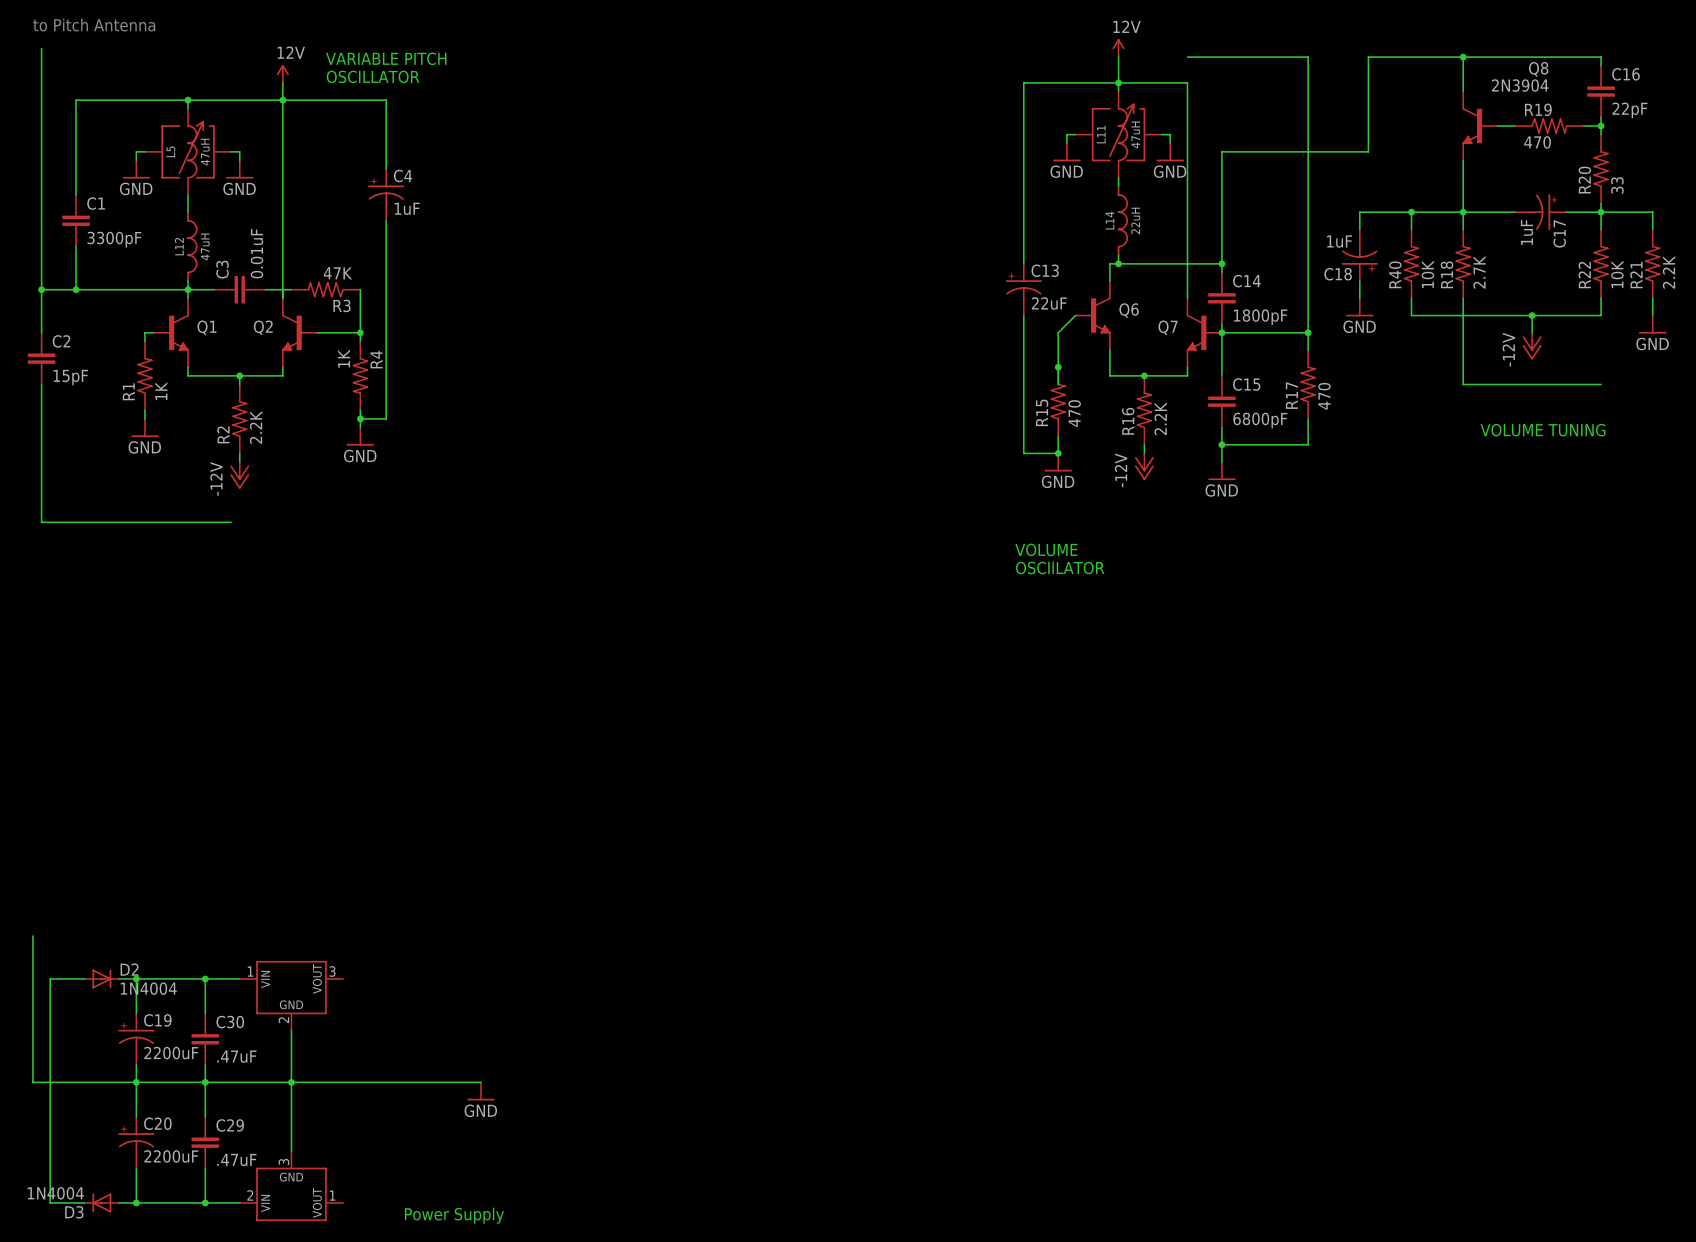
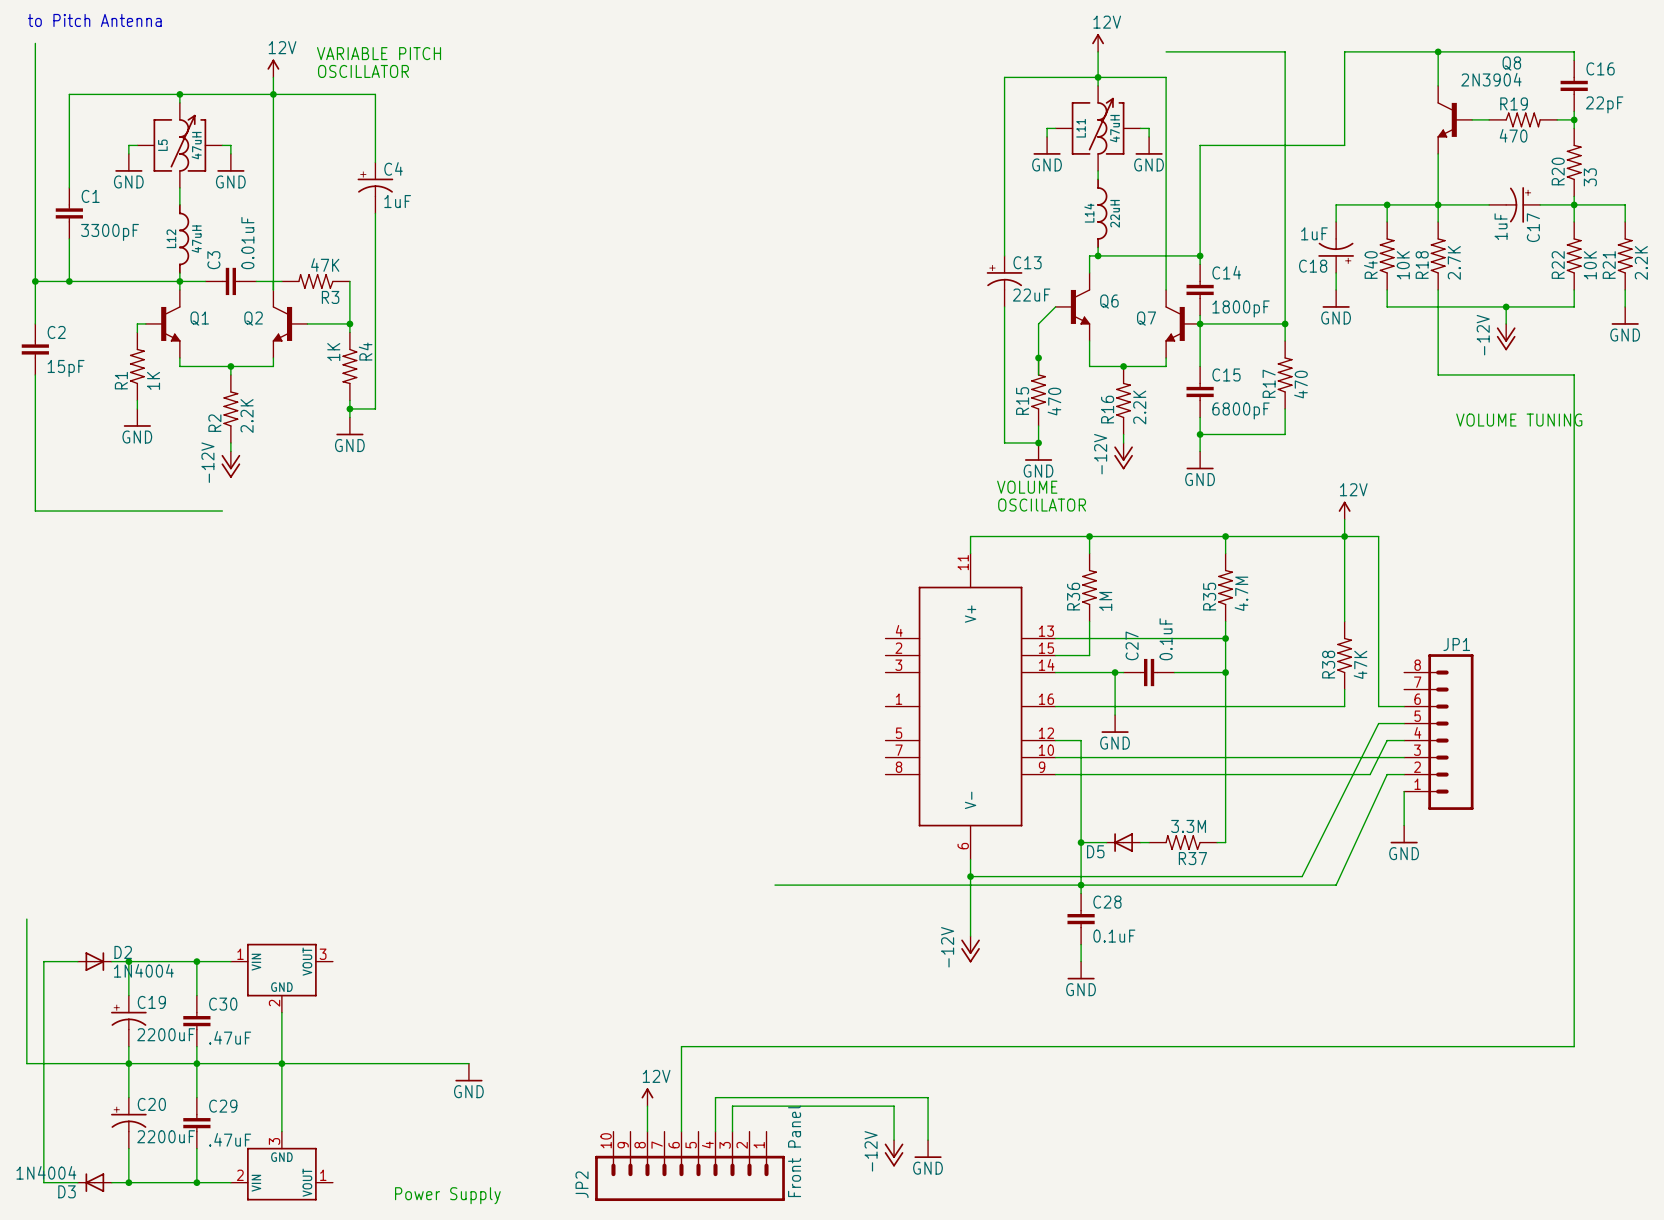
wire: none -> (1574, 374) (1574, 1046) (681, 1046) (681, 1131)
power symbol: none -> 12V (1344, 510)
wire: none -> (1344, 519) (1344, 621)
wire: none -> (1089, 536) (1089, 553)
junction: none -> (1089, 536)
wire: none -> (1225, 536) (1225, 553)
junction: none -> (1225, 536)
junction: none -> (1344, 536)
text position: VOLUME (1046, 549) -> VOLUME (1027, 487)
wire: none -> (970, 553) (970, 536) (1378, 536) (1378, 706) (1404, 706)
text position: OSCIlLATOR (1060, 567) -> OSCIlLATOR (1042, 505)
R36: none -> 1M (1089, 587)
R35: none -> 4.7M (1225, 587)
wire: none -> (1089, 621) (1089, 655) (1055, 655)
wire: none -> (1225, 621) (1225, 842) (1217, 842)
wire: none -> (1055, 638) (1225, 638)
junction: none -> (1225, 638)
R38: none -> 47K (1344, 655)
wire: none -> (1055, 672) (1123, 672)
wire: none -> (1115, 672) (1115, 715)
junction: none -> (1115, 672)
C27: none -> 0.1uF (1149, 672)
wire: none -> (1174, 672) (1225, 672)
junction: none -> (1225, 672)
wire: none -> (1344, 689) (1344, 706) (1055, 706)
part: none -> (970, 706)
wire: none -> (1404, 723) (1378, 723) (1302, 876) (970, 876)
power symbol: none -> GND (1115, 723)
JP1: none -> (1438, 732)
wire: none -> (1055, 740) (1081, 740) (1081, 893)
wire: none -> (1404, 740) (1387, 740) (1370, 774) (1055, 774)
wire: none -> (1055, 757) (1404, 757)
wire: none -> (1404, 774) (1387, 774) (1336, 885) (775, 885)
wire: none -> (1404, 791) (1404, 825)
power symbol: none -> GND (1404, 834)
wire: none -> (1081, 842) (1106, 842)
junction: none -> (1081, 842)
D5: none -> (1123, 842)
wire: none -> (1140, 842) (1149, 842)
R37: none -> 3.3M (1183, 842)
wire: none -> (970, 859) (970, 936)
junction: none -> (970, 876)
junction: none -> (1081, 885)
C28: none -> 0.1uF (1081, 919)
wire: none -> (1081, 944) (1081, 961)
power symbol: none -> -12V (970, 949)
power symbol: none -> GND (1081, 970)
power symbol: none -> 12V (647, 1097)
wire: none -> (647, 1106) (647, 1131)
wire: none -> (715, 1131) (715, 1097) (928, 1097) (928, 1140)
wire: none -> (732, 1131) (732, 1106) (894, 1106) (894, 1140)
power symbol: none -> GND (928, 1149)
power symbol: none -> -12V (894, 1153)
JP2: none -> Front Panel (689, 1166)

